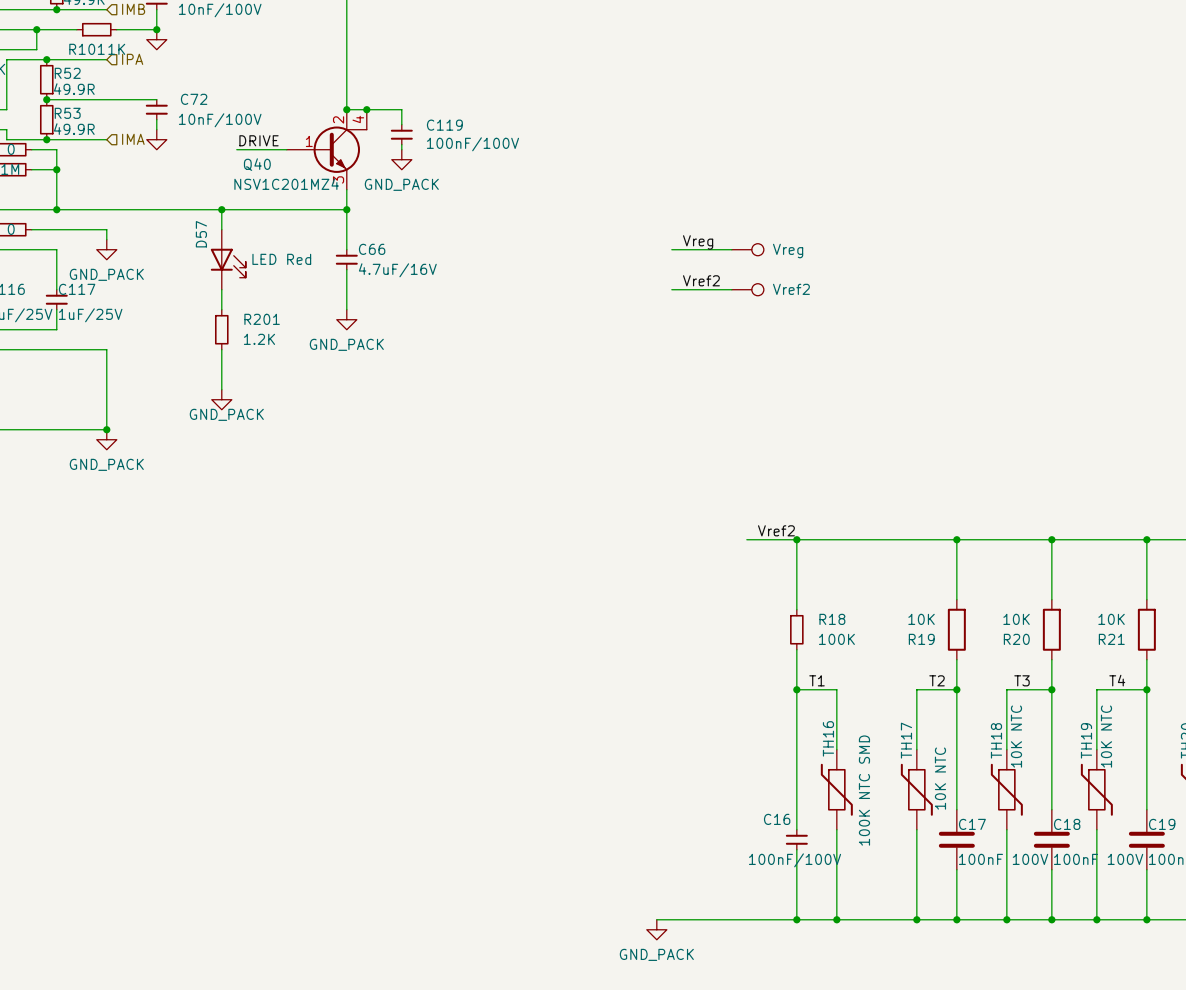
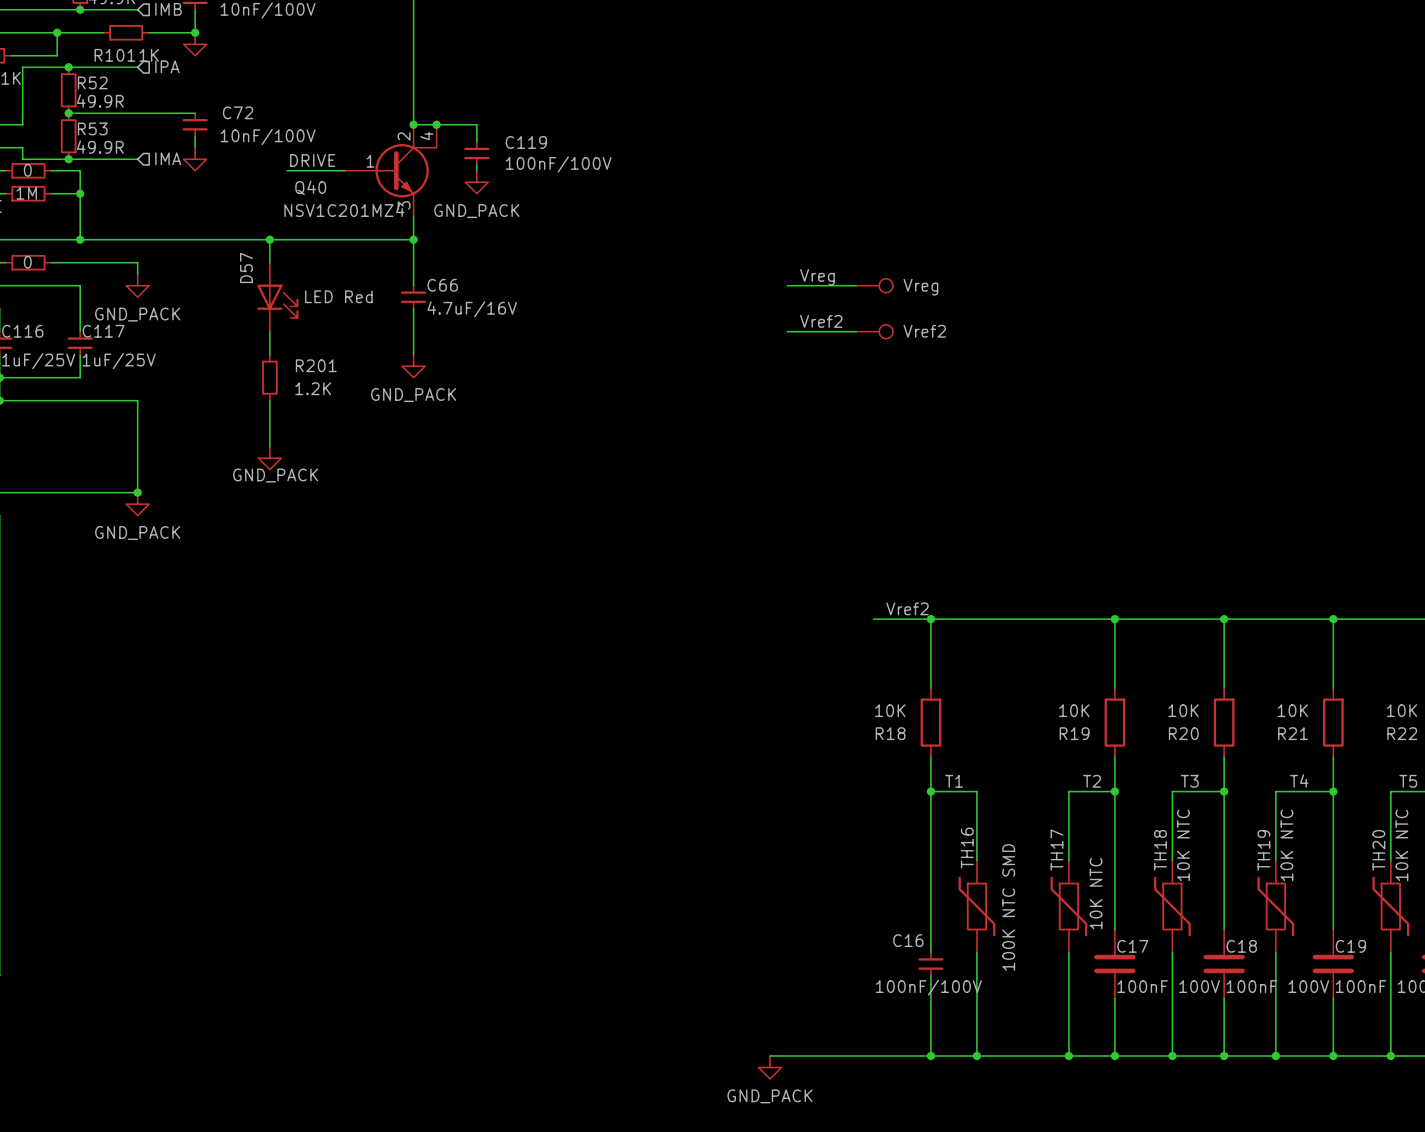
R18 symbol: [790, 609, 804, 650] -> [920, 688, 942, 758]
R18 name position: R18 (832, 619) -> R18 (890, 733)
R18 value: 100K (836, 639) -> 10K (890, 710)

